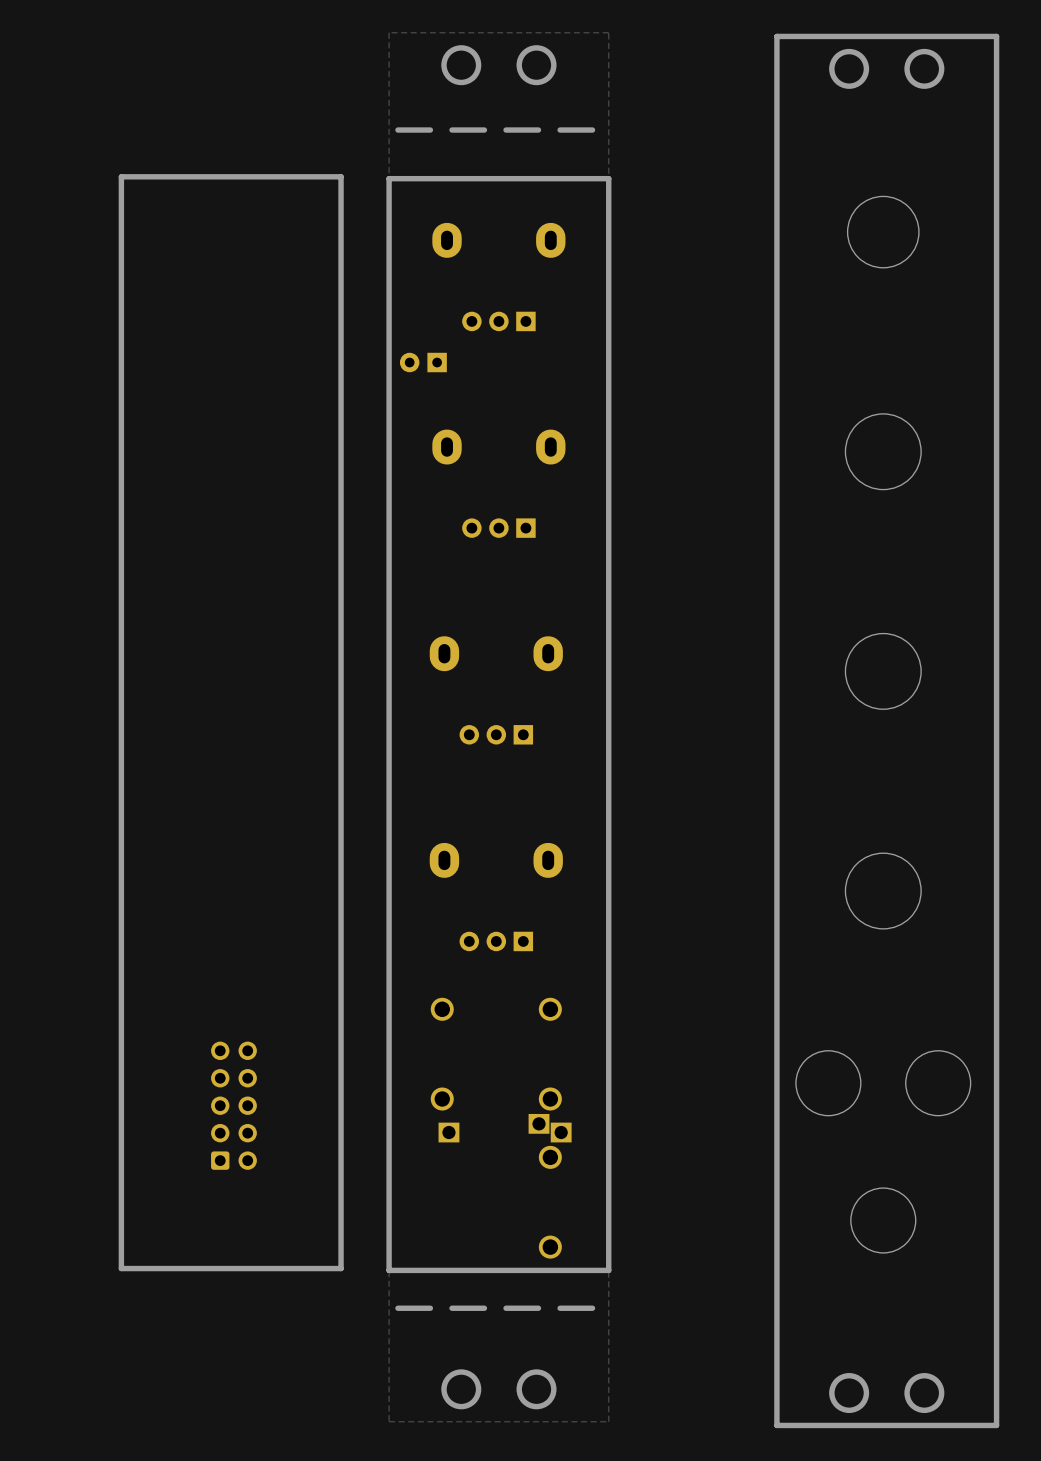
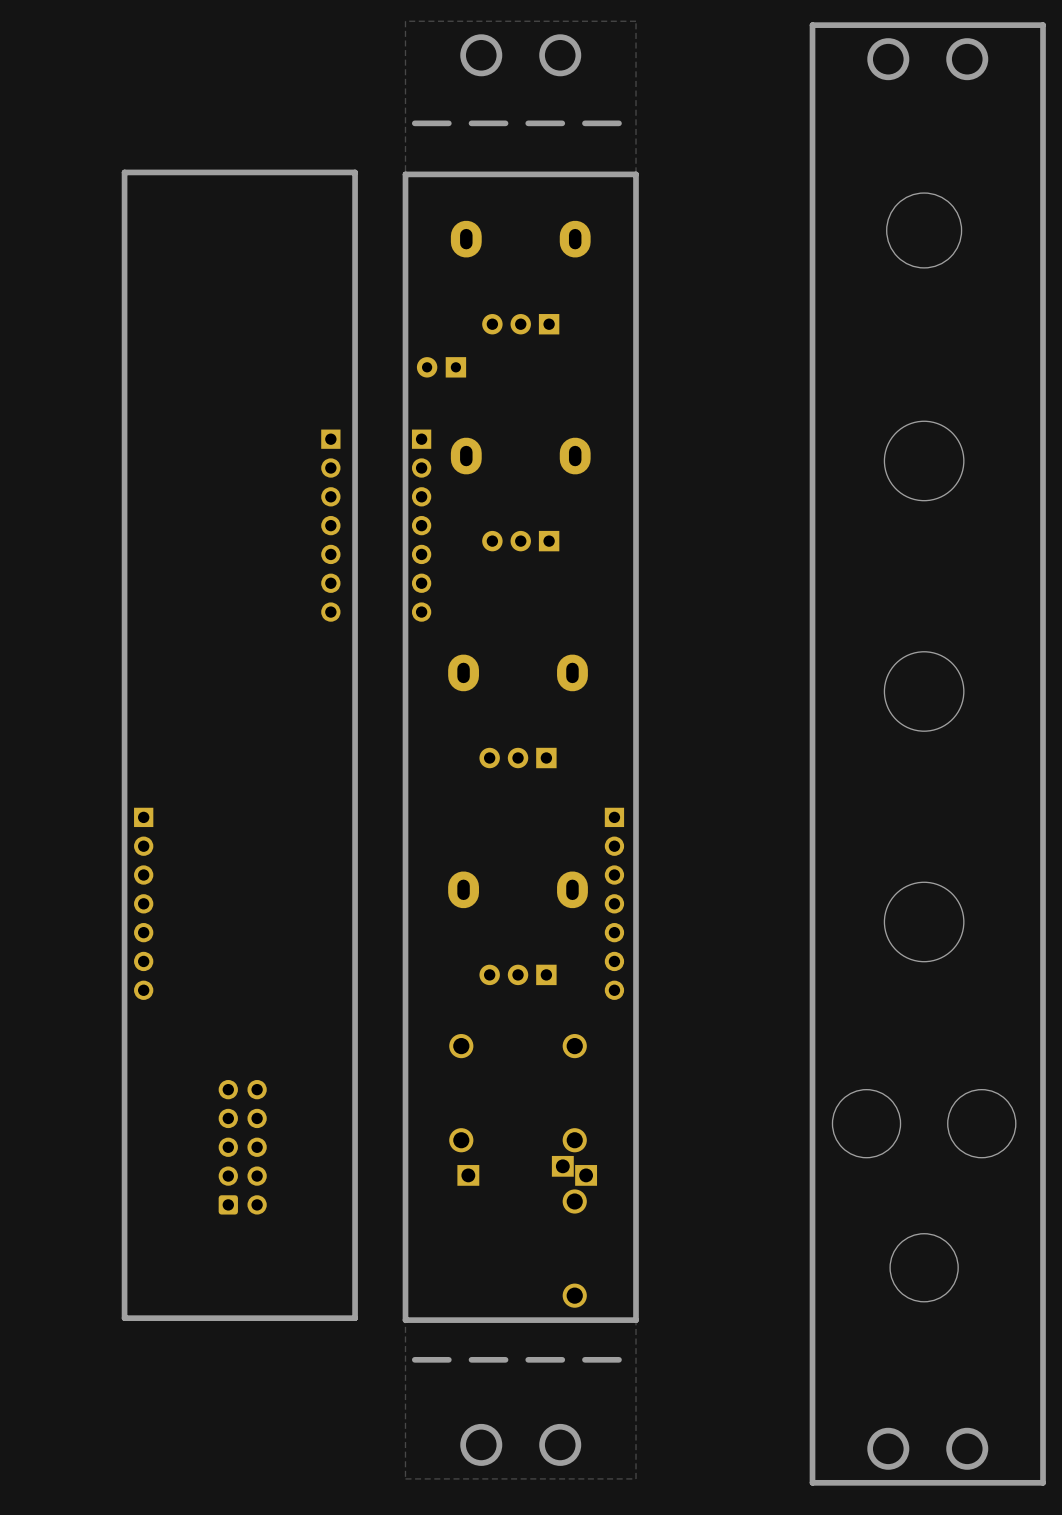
part: none -> (330, 525)
part: none -> (421, 525)
part: none -> (143, 903)
part: none -> (614, 903)

